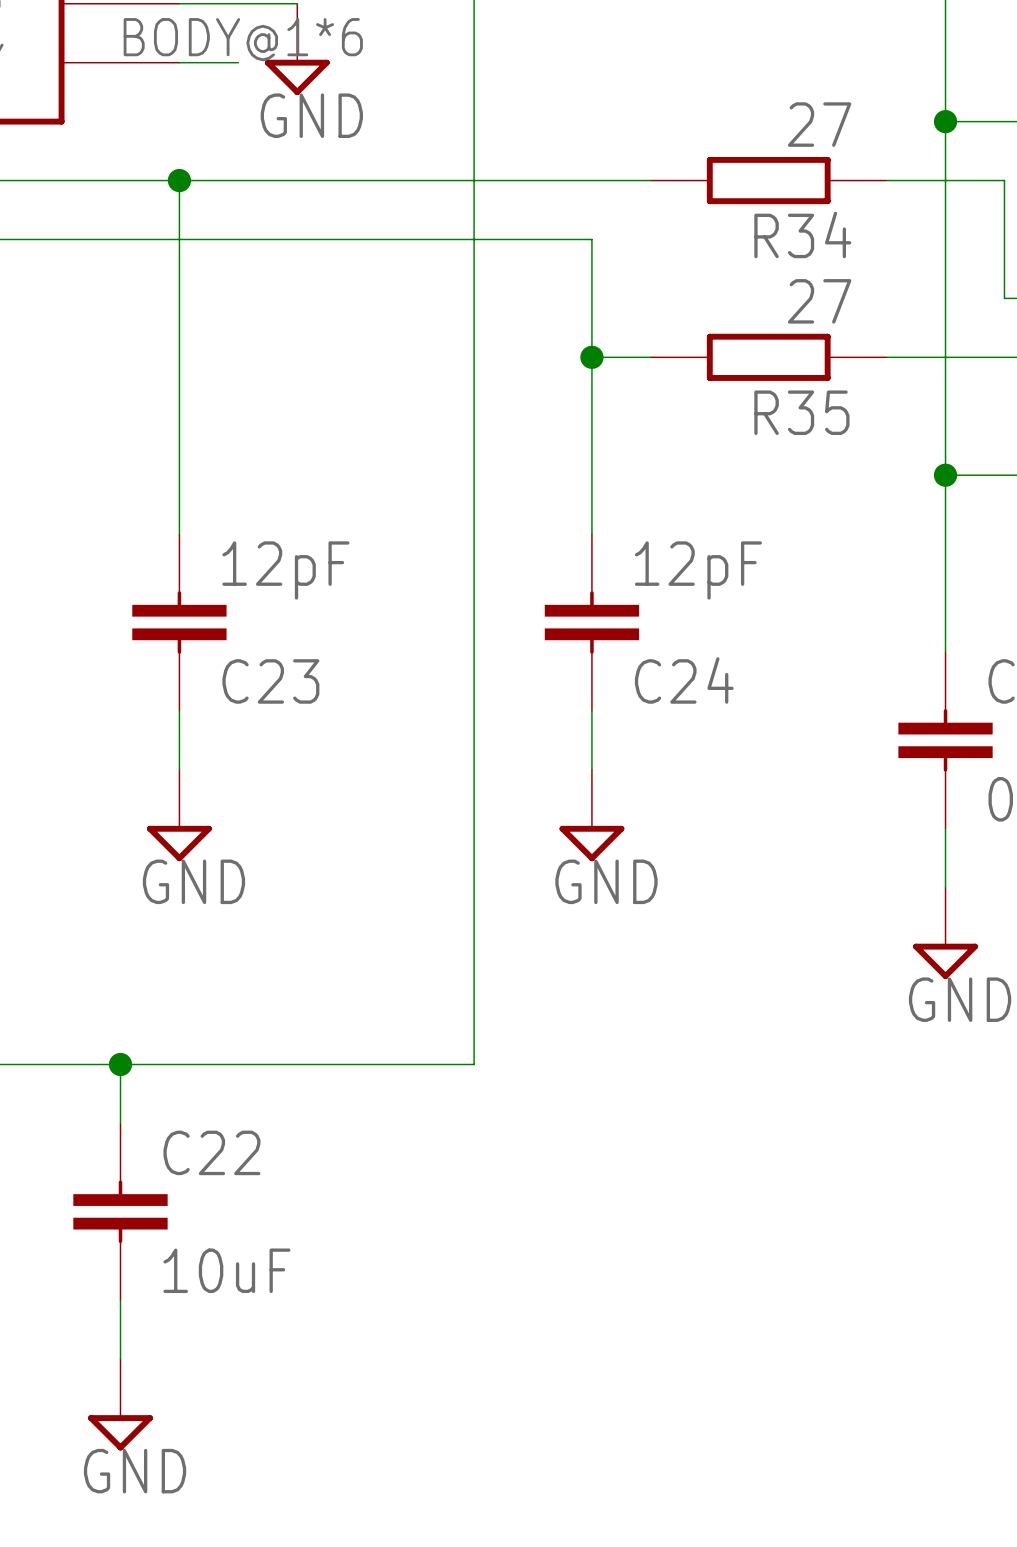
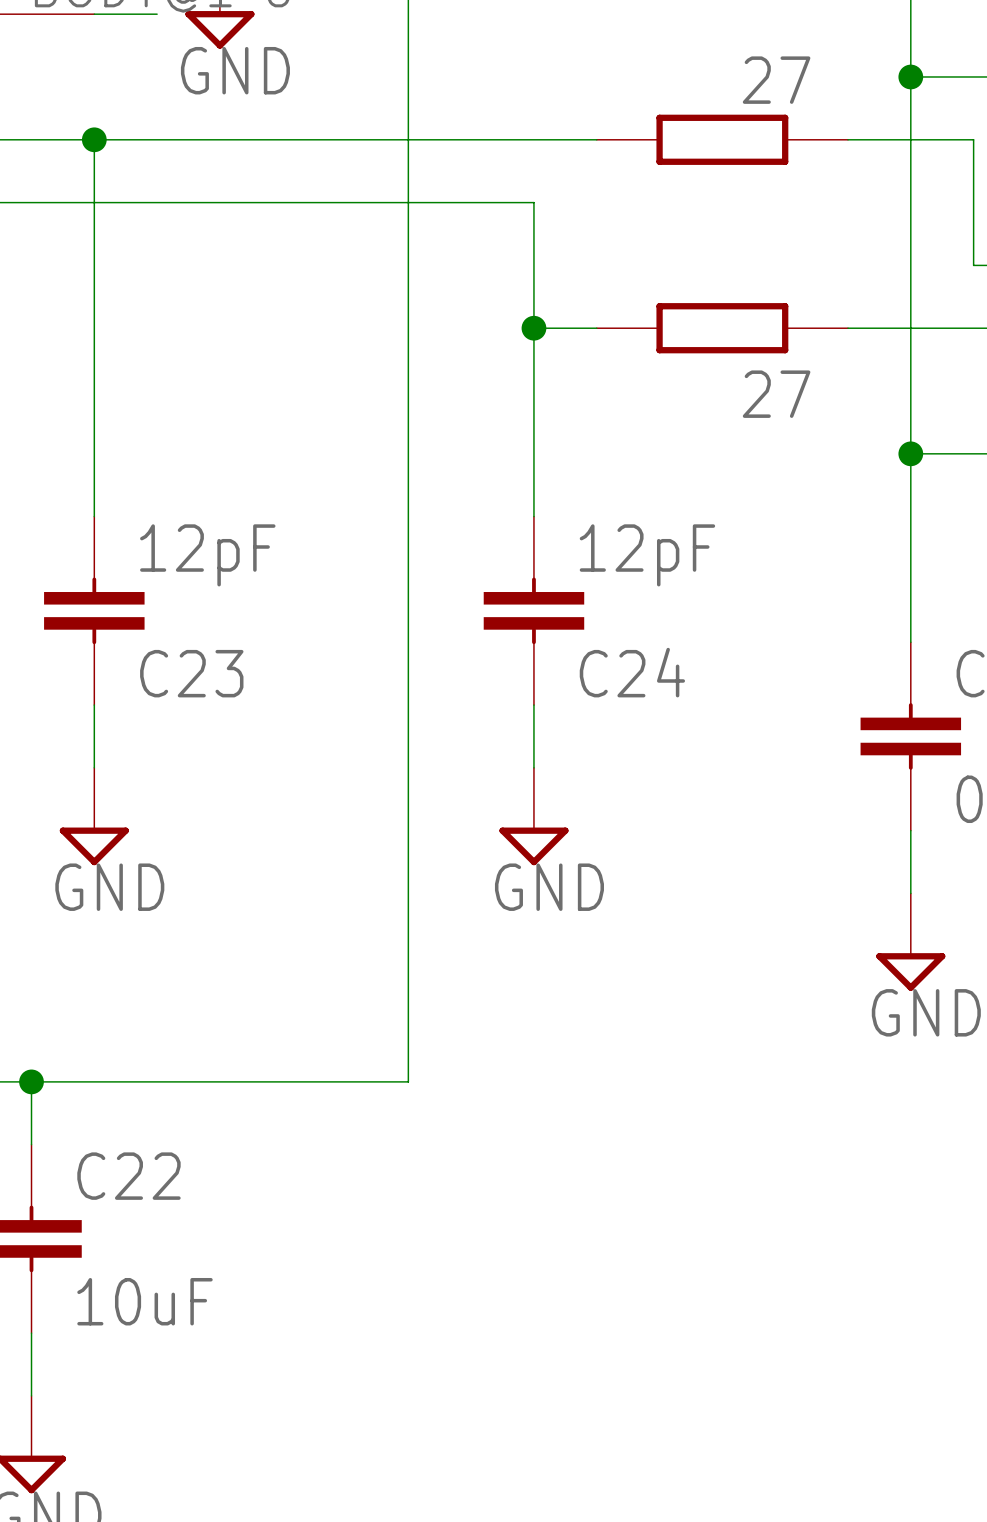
R34 name: R34 (802, 234) -> none
R35 value position: 27 (819, 301) -> 27 (776, 394)
R35 name: R35 (801, 412) -> none

